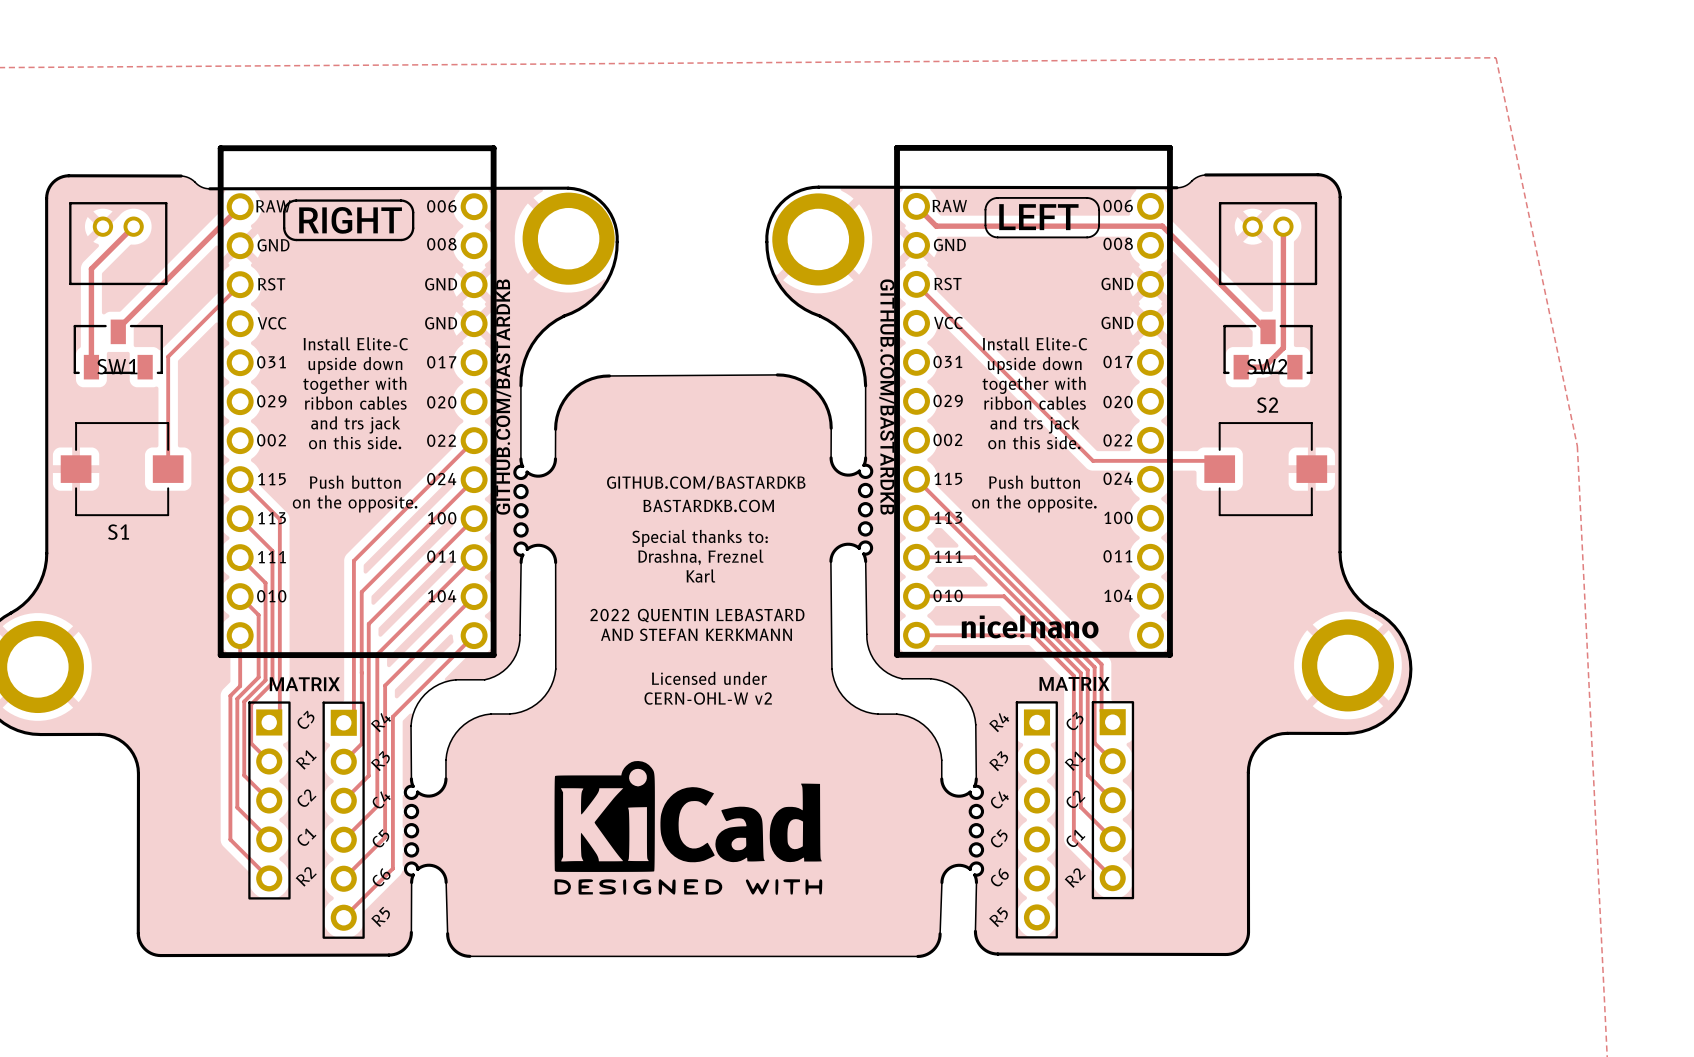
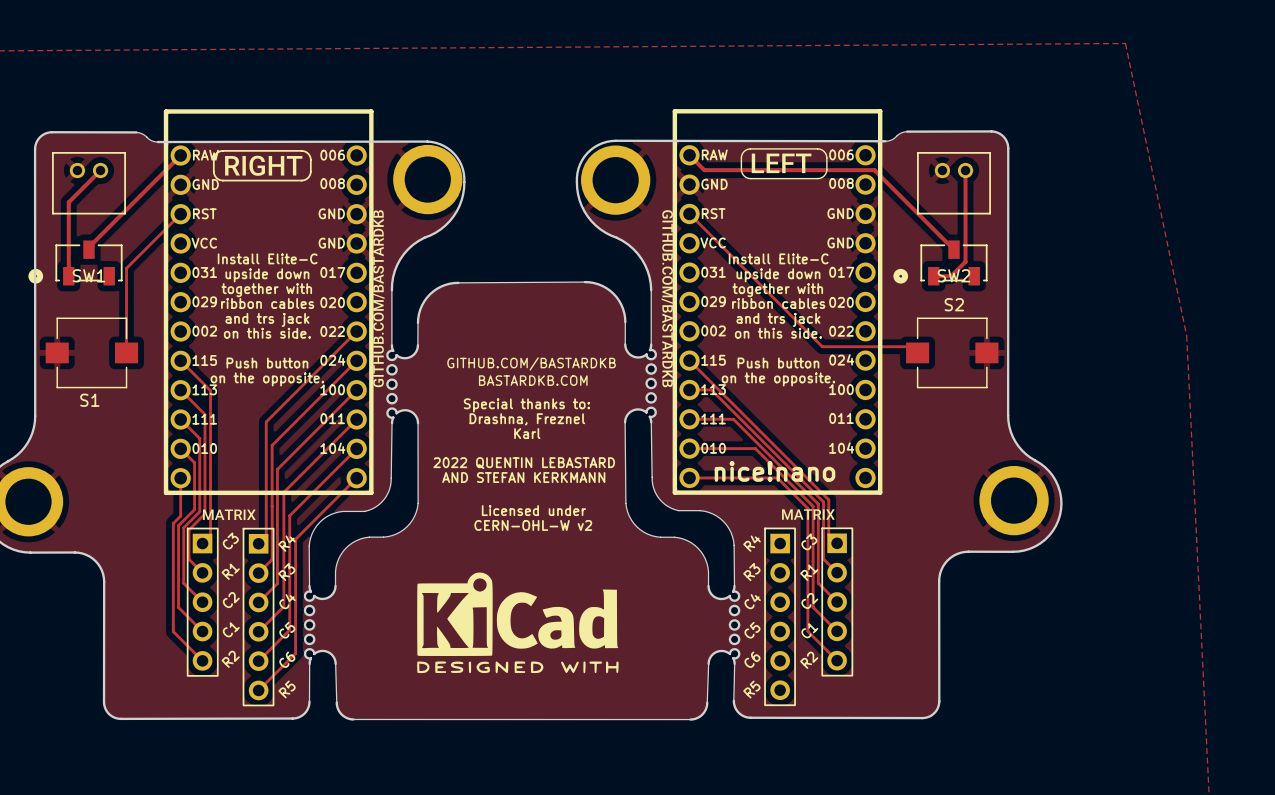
SW1 footprint: [73, 319, 163, 380] -> [28, 240, 123, 286]
SW2 footprint: [1223, 319, 1313, 380] -> [893, 240, 988, 286]

